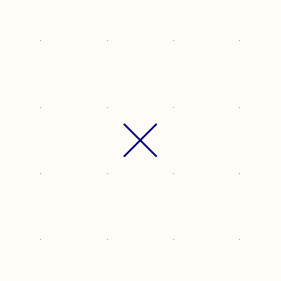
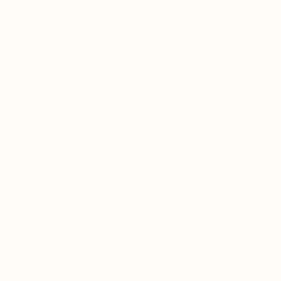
no-connect mark: (140, 140) -> none

